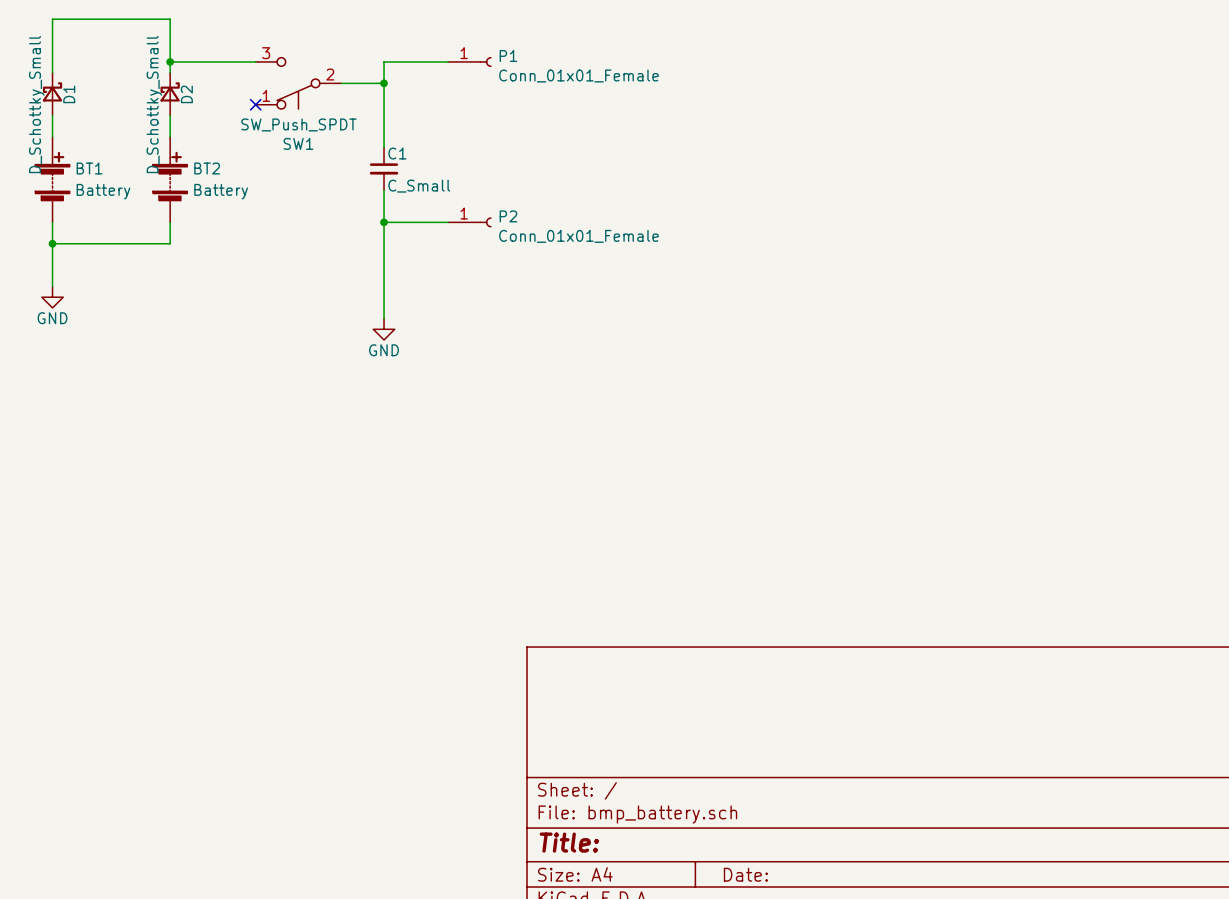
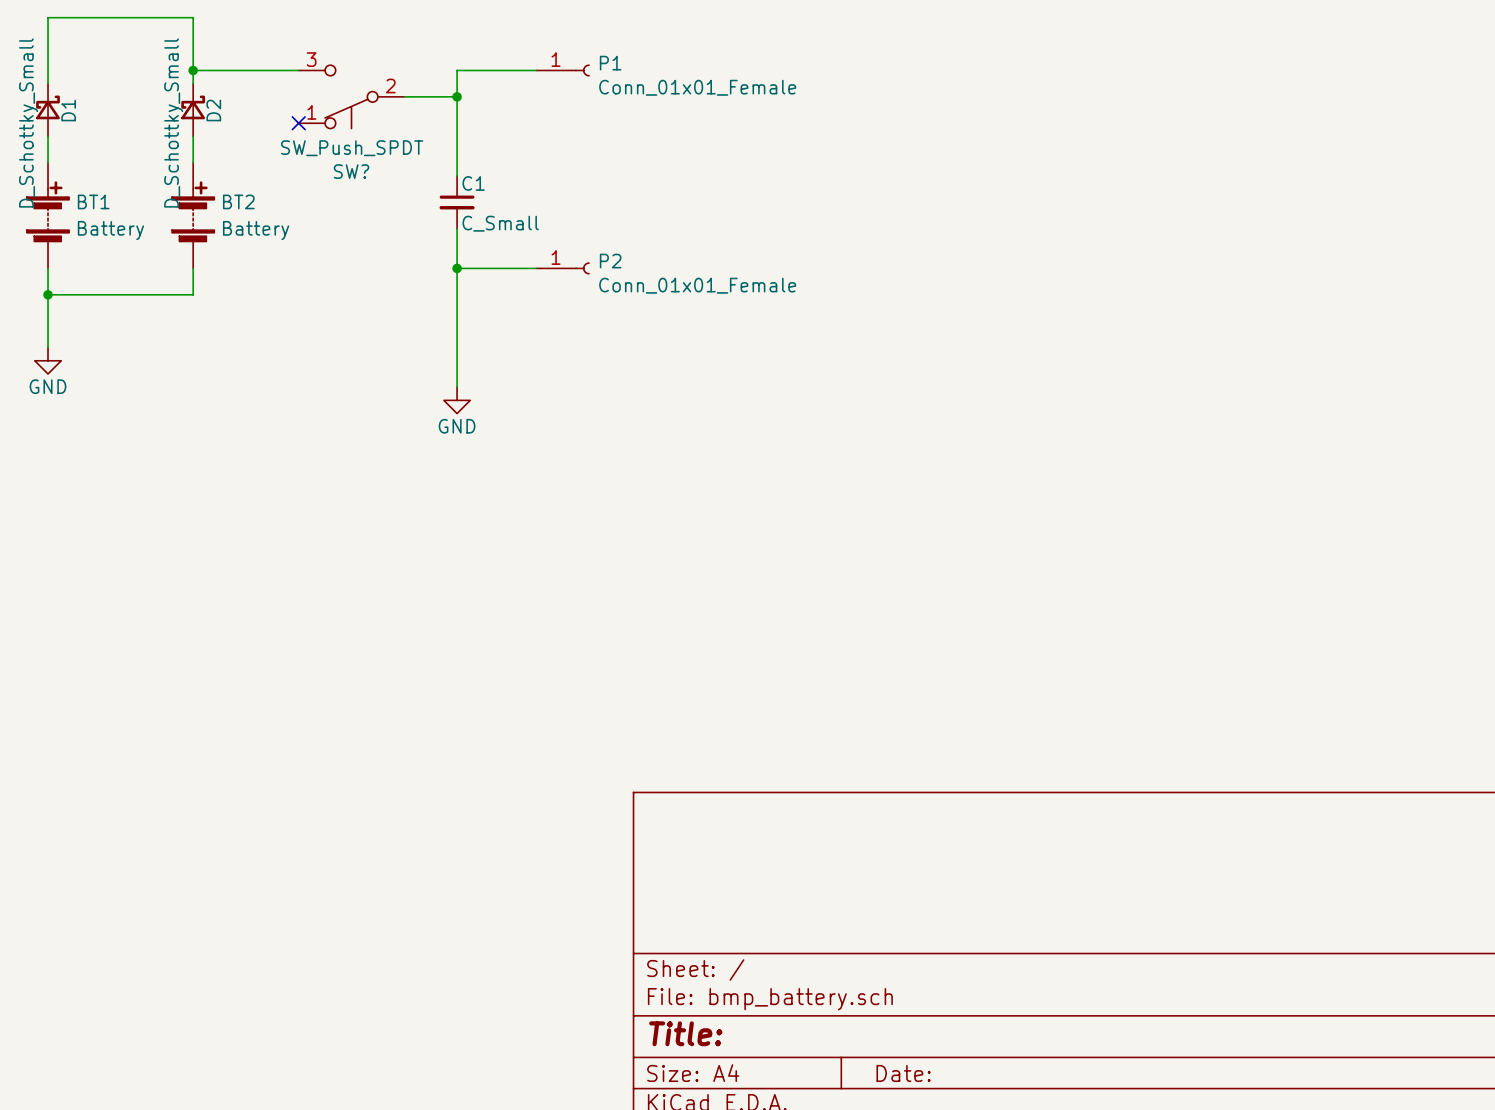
SW1 name: SW1 (298, 143) -> SW? (351, 171)

